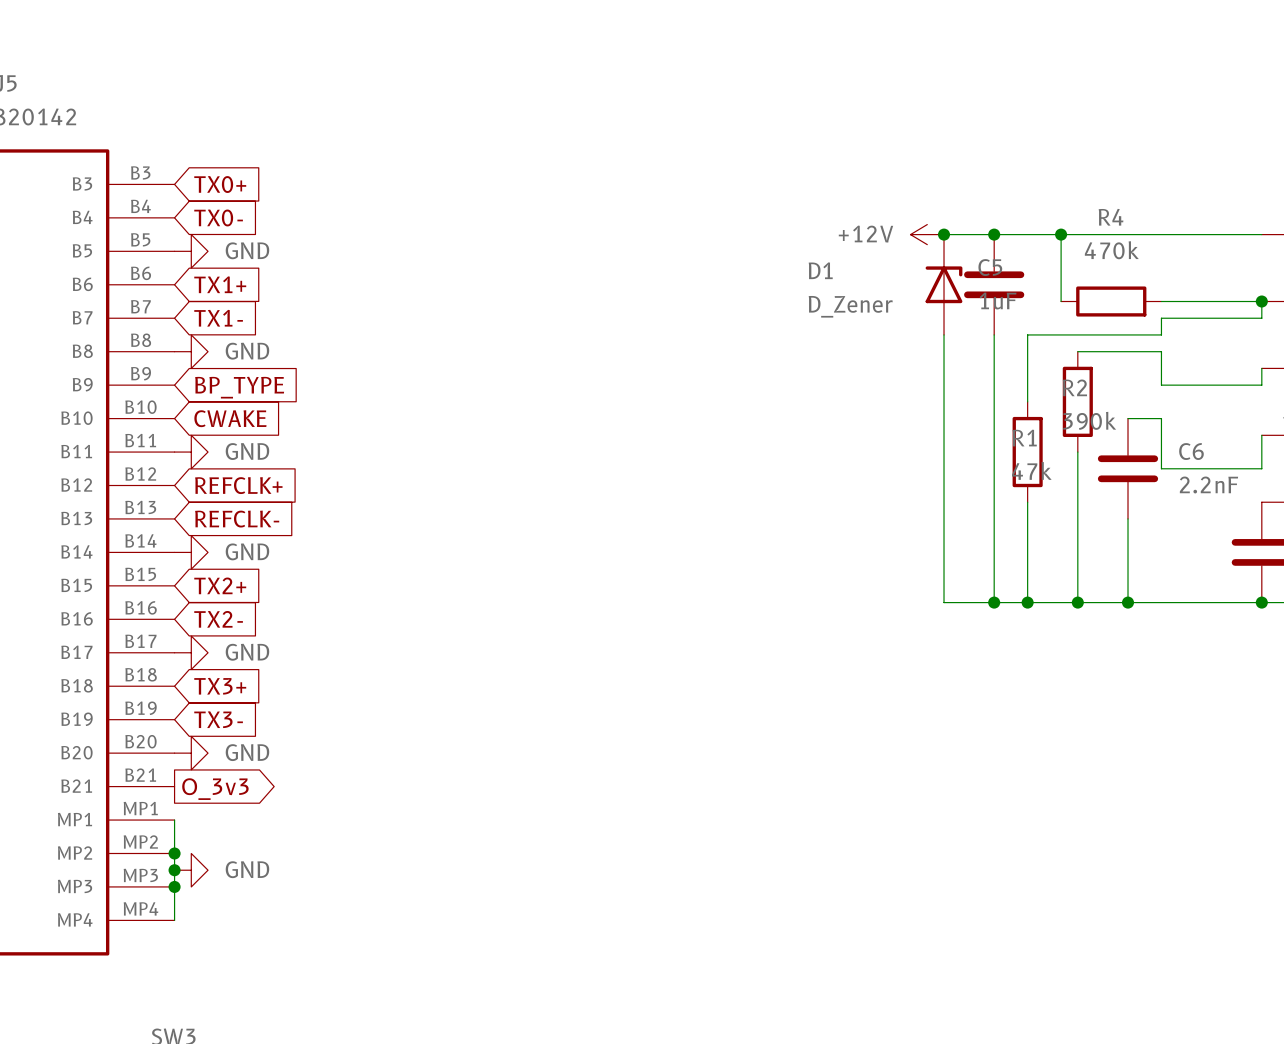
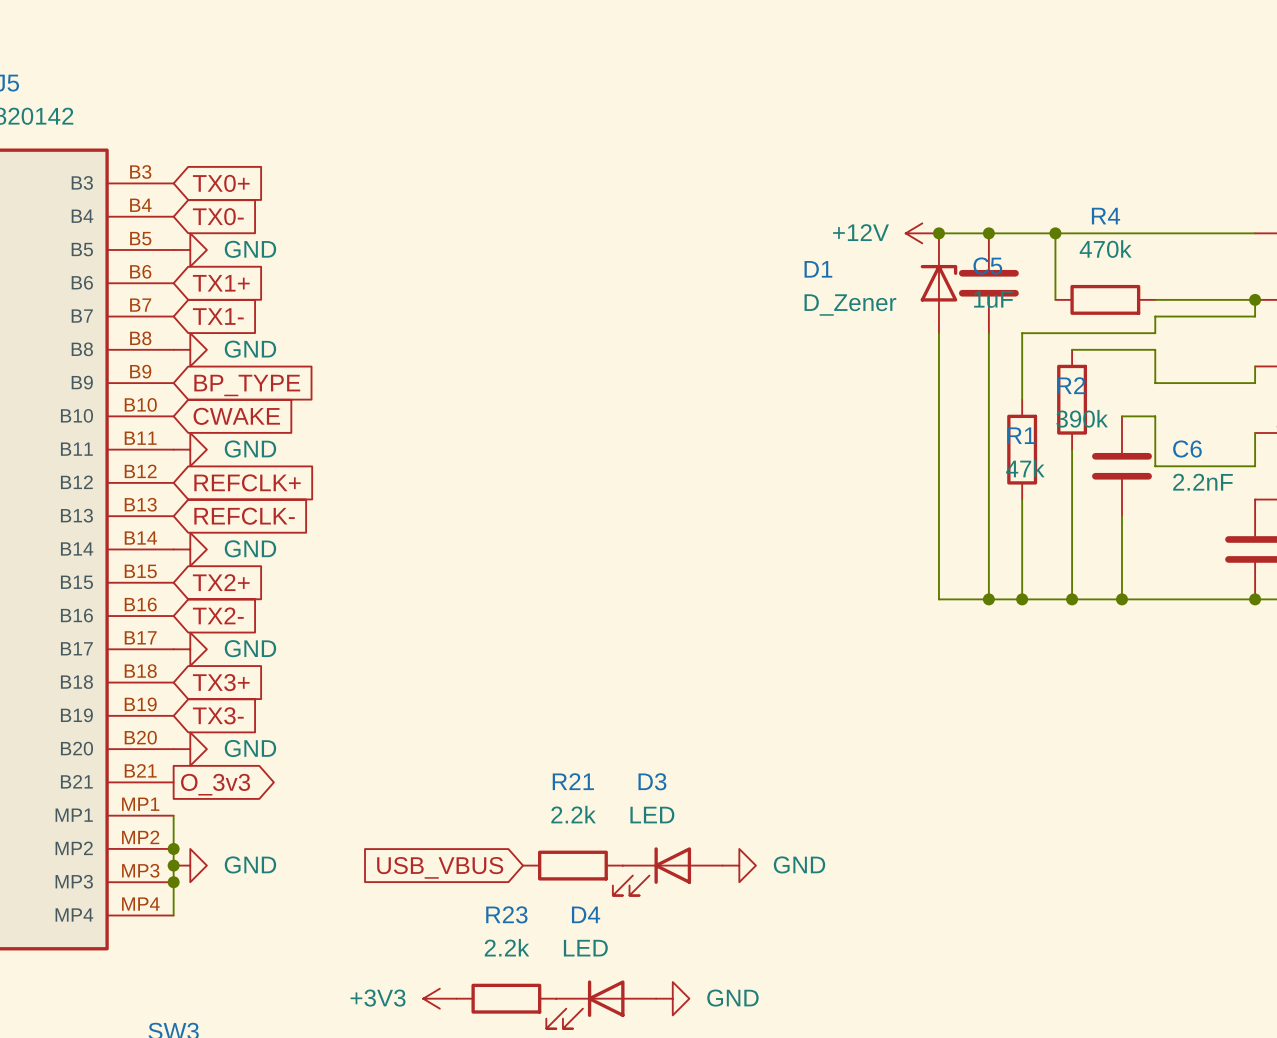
R21: none -> 2.2k (572, 865)
power symbol: none -> GND (739, 865)
global label: none -> USB_VBUS (440, 867)
D3: none -> LED (667, 871)
power symbol: none -> +3V3 (439, 998)
R23: none -> 2.2k (506, 998)
power symbol: none -> GND (672, 998)
D4: none -> LED (601, 1004)

